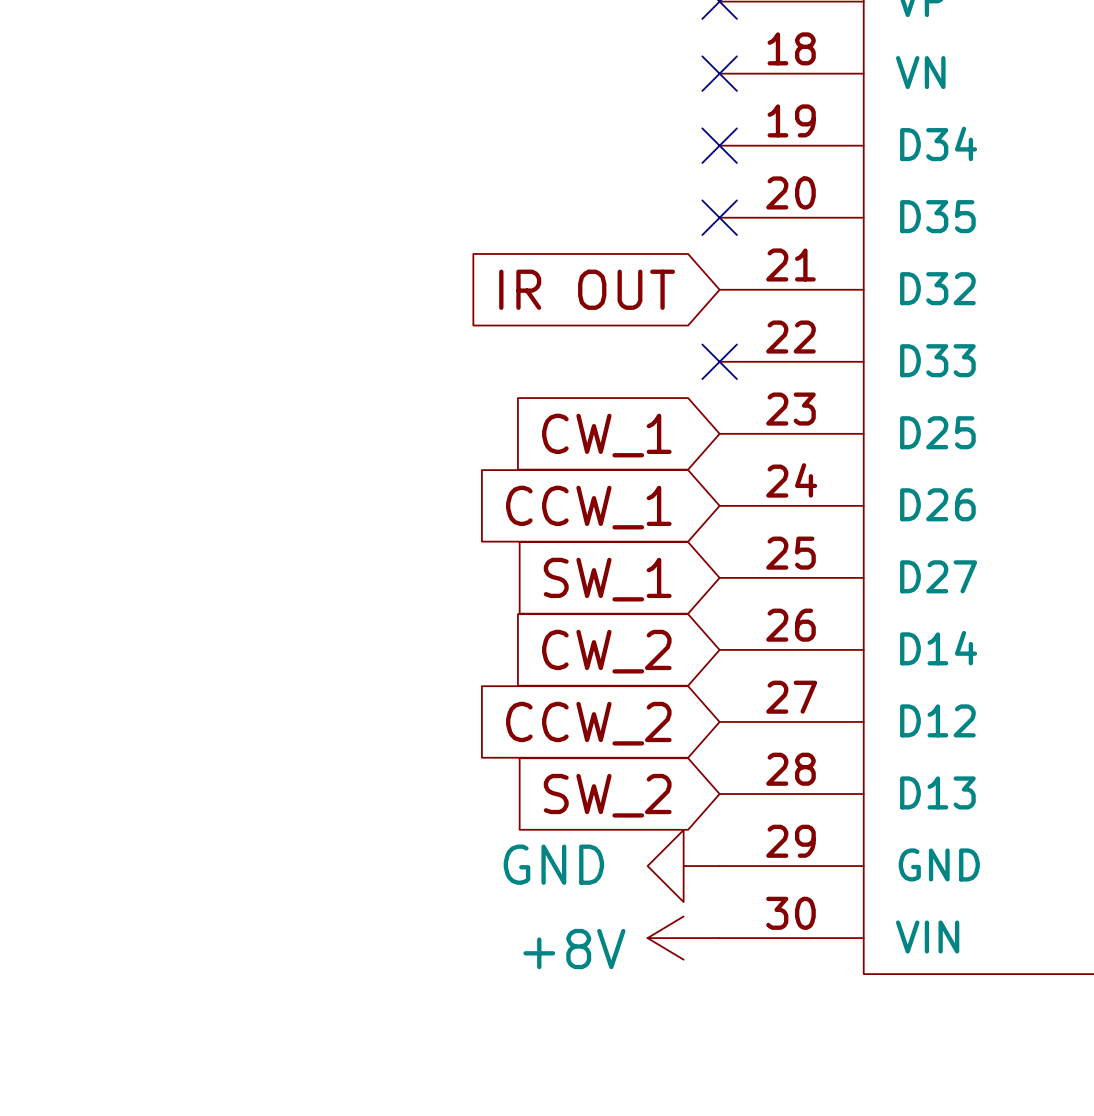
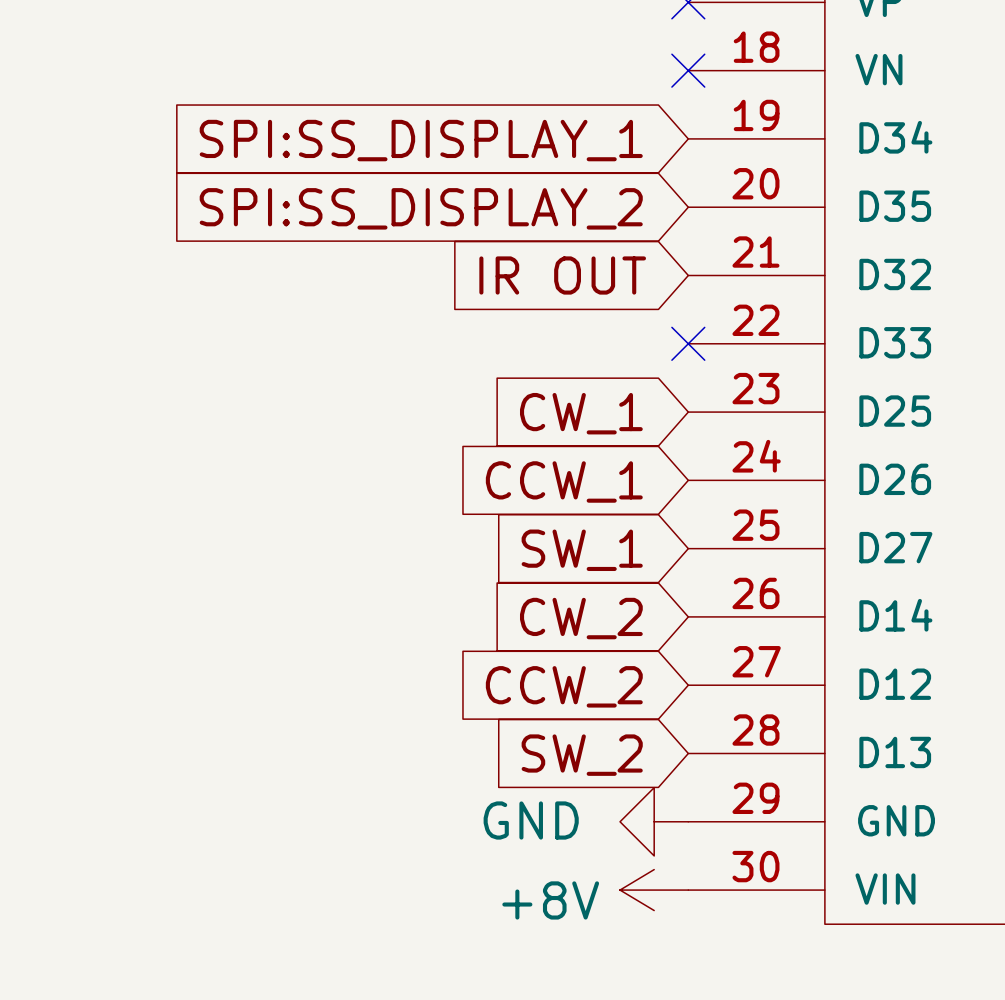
no-connect mark: (719, 145) -> none
global label: none -> SPI:SS_DISPLAY_1 (421, 140)
no-connect mark: (719, 217) -> none
global label: none -> SPI:SS_DISPLAY_2 (421, 208)

